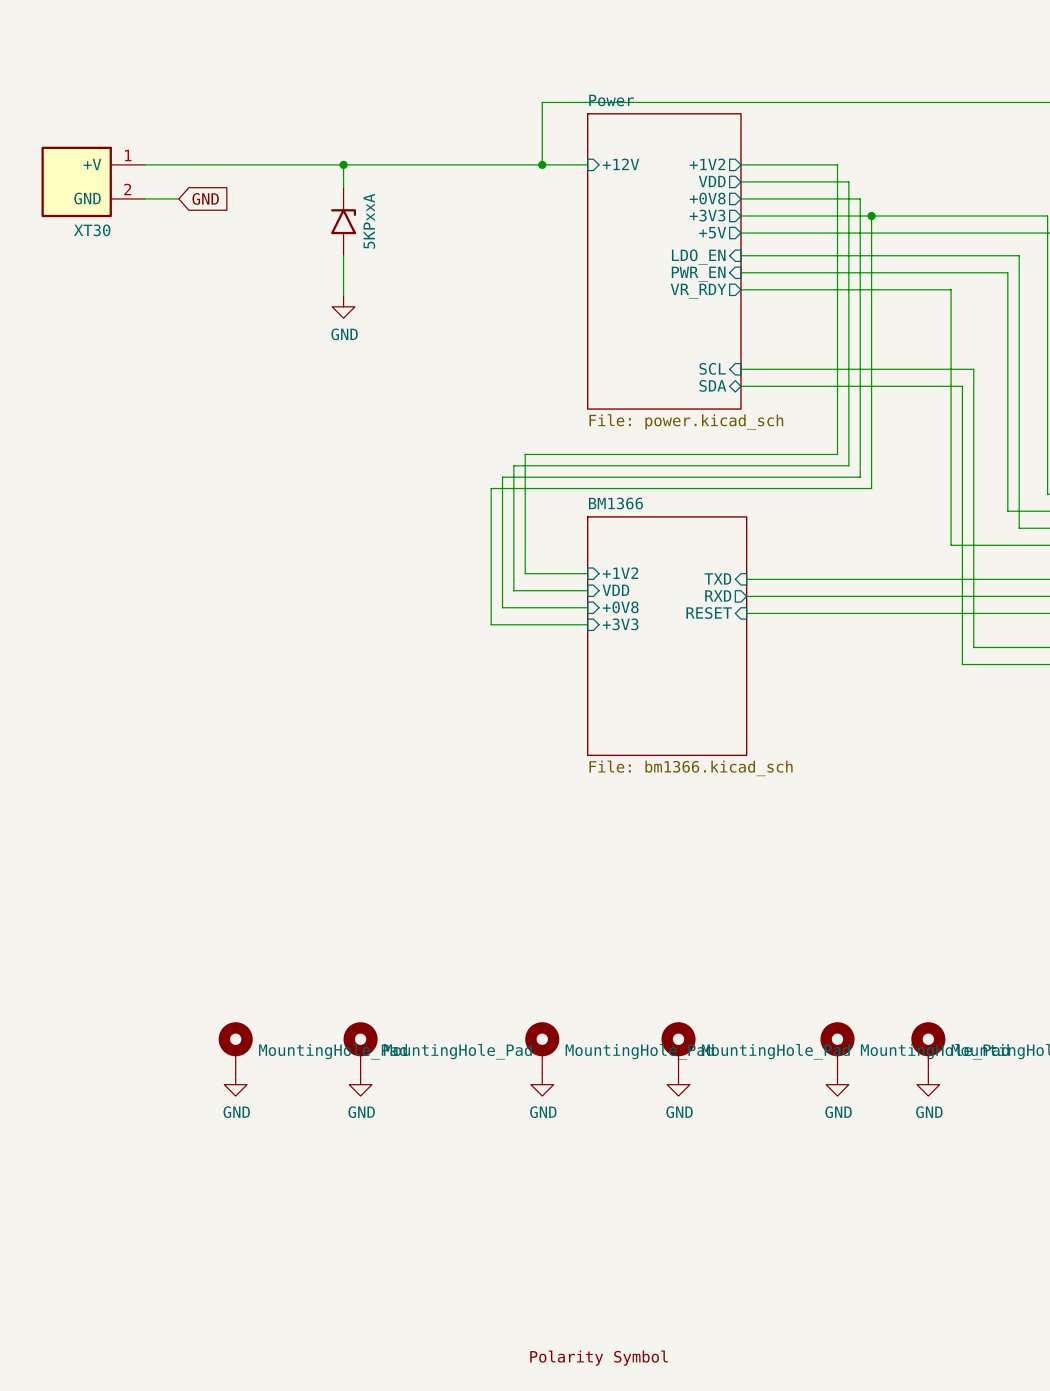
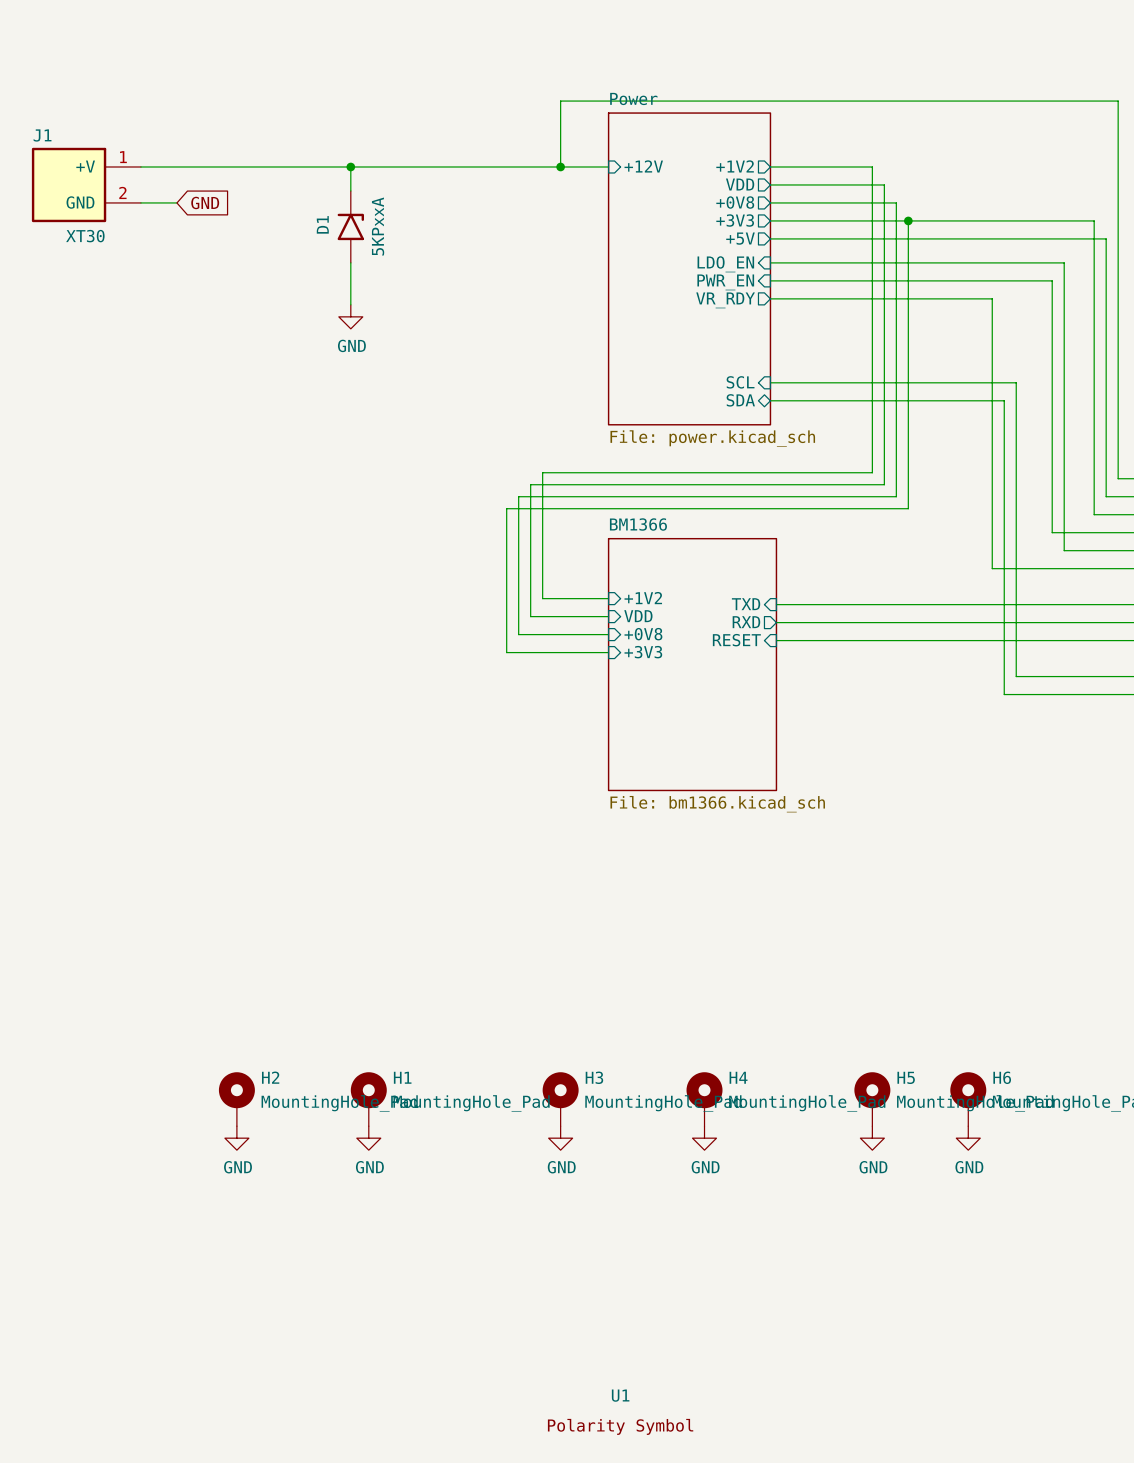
J1 name: none -> J1 (42, 135)
D1 name: none -> D1 (322, 224)
H2 name: none -> H2 (270, 1077)
H1 name: none -> H1 (402, 1077)
H3 name: none -> H3 (594, 1077)
H4 name: none -> H4 (738, 1077)
H5 name: none -> H5 (906, 1077)
H6 name: none -> H6 (1002, 1077)
U1: none -> (620, 1412)

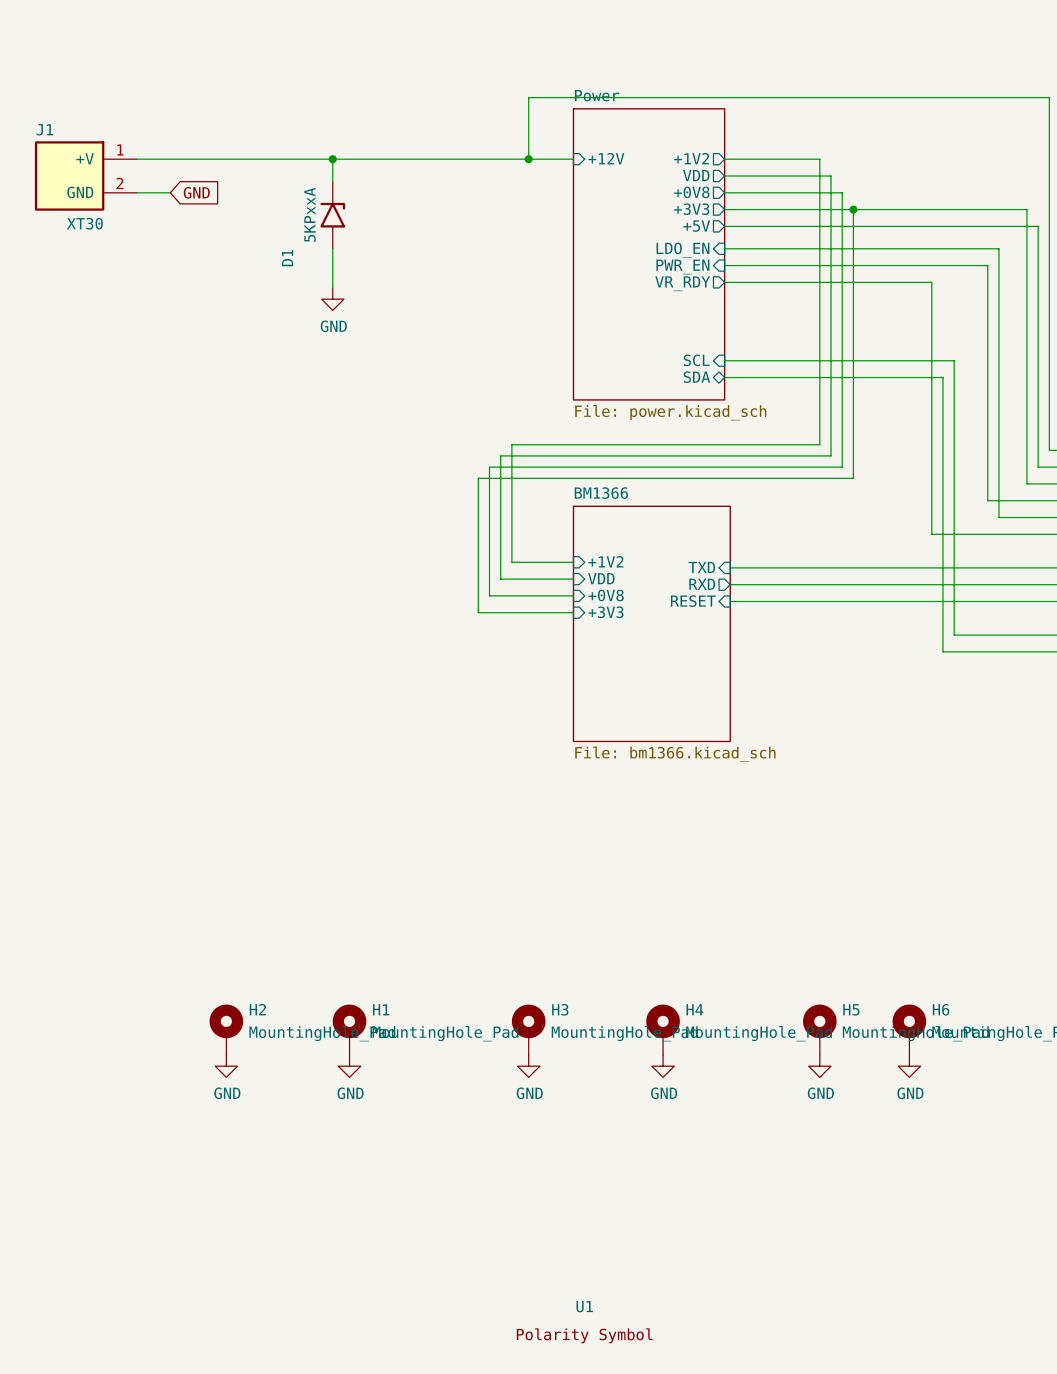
D1 name position: D1 (322, 224) -> D1 (287, 258)
D1 value position: 5KPxxA (378, 226) -> 5KPxxA (310, 214)

